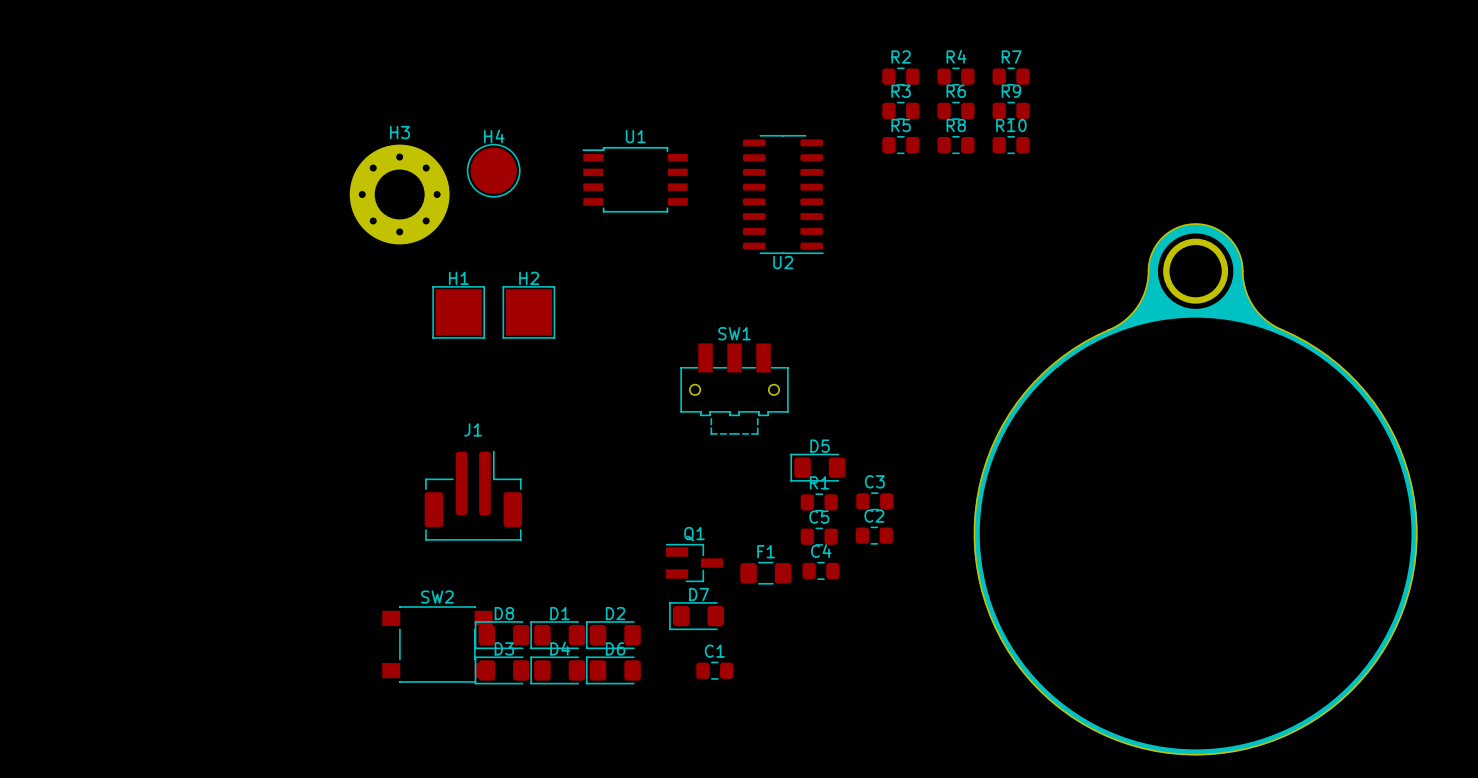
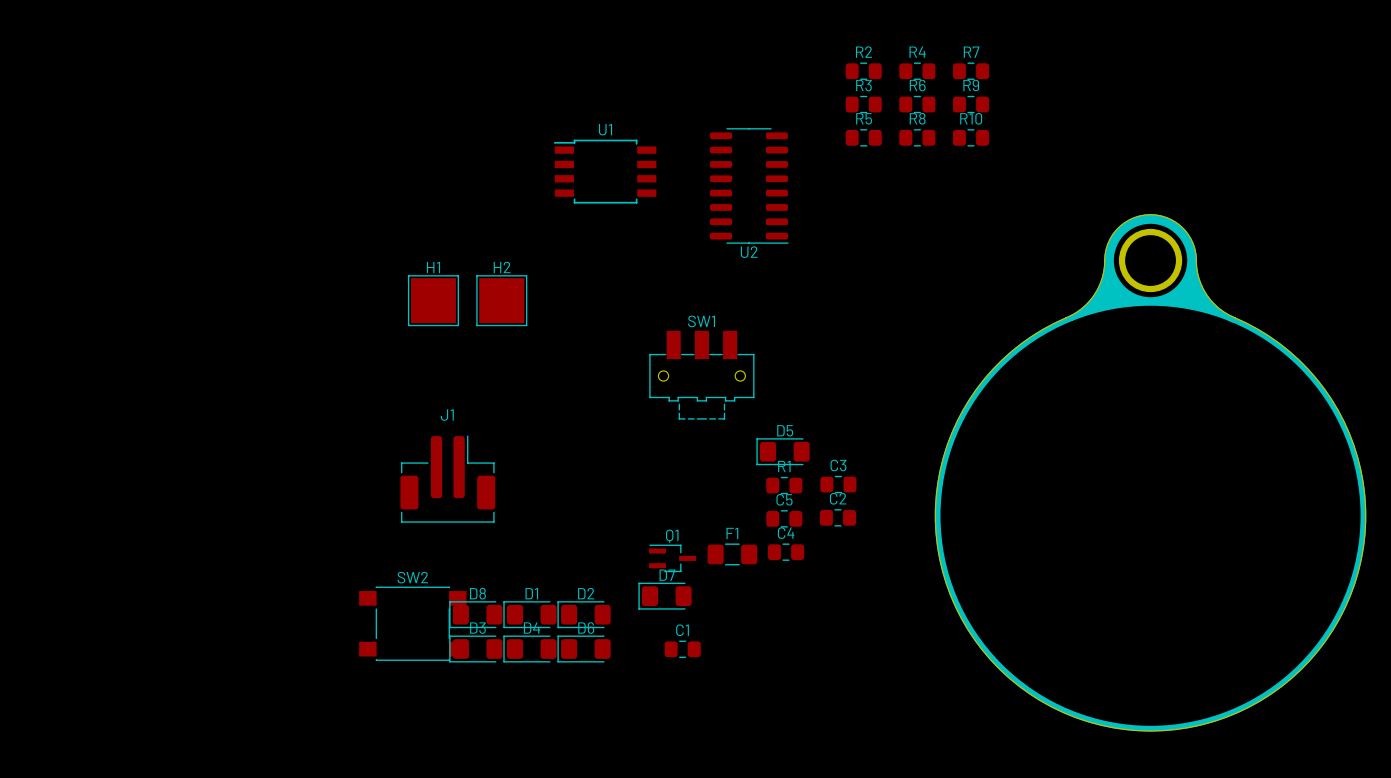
H4: (493, 170) -> none
H3: (399, 194) -> none
Q1 footprint: [665, 543, 723, 583] -> [649, 544, 697, 573]

